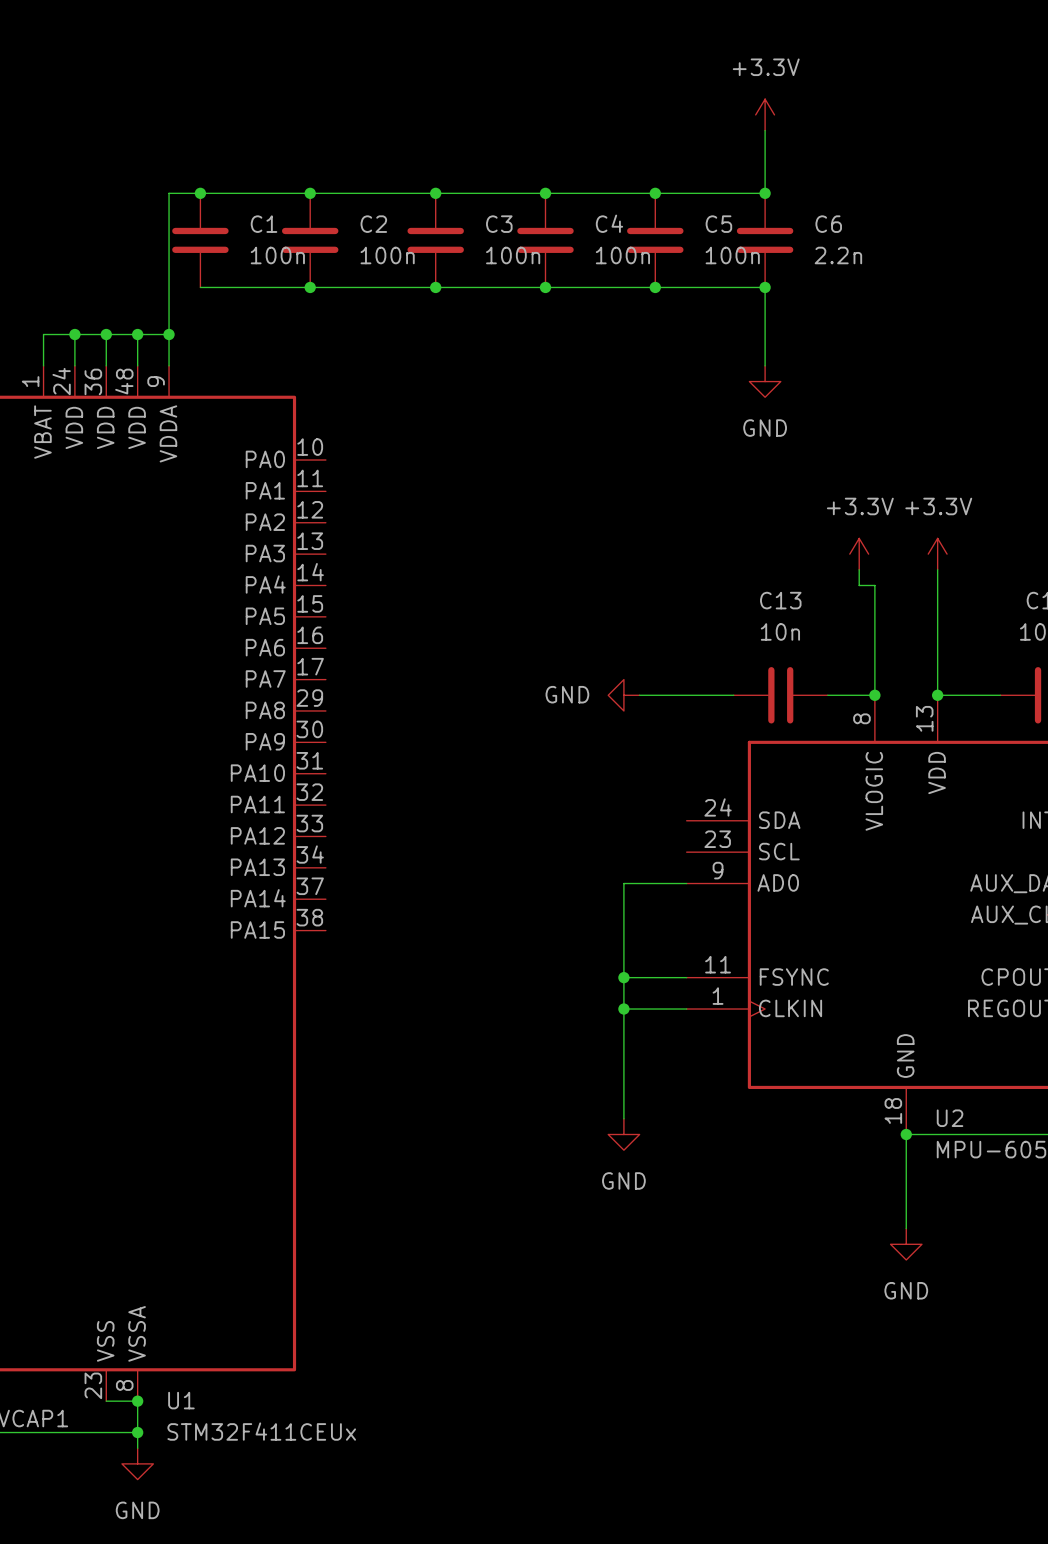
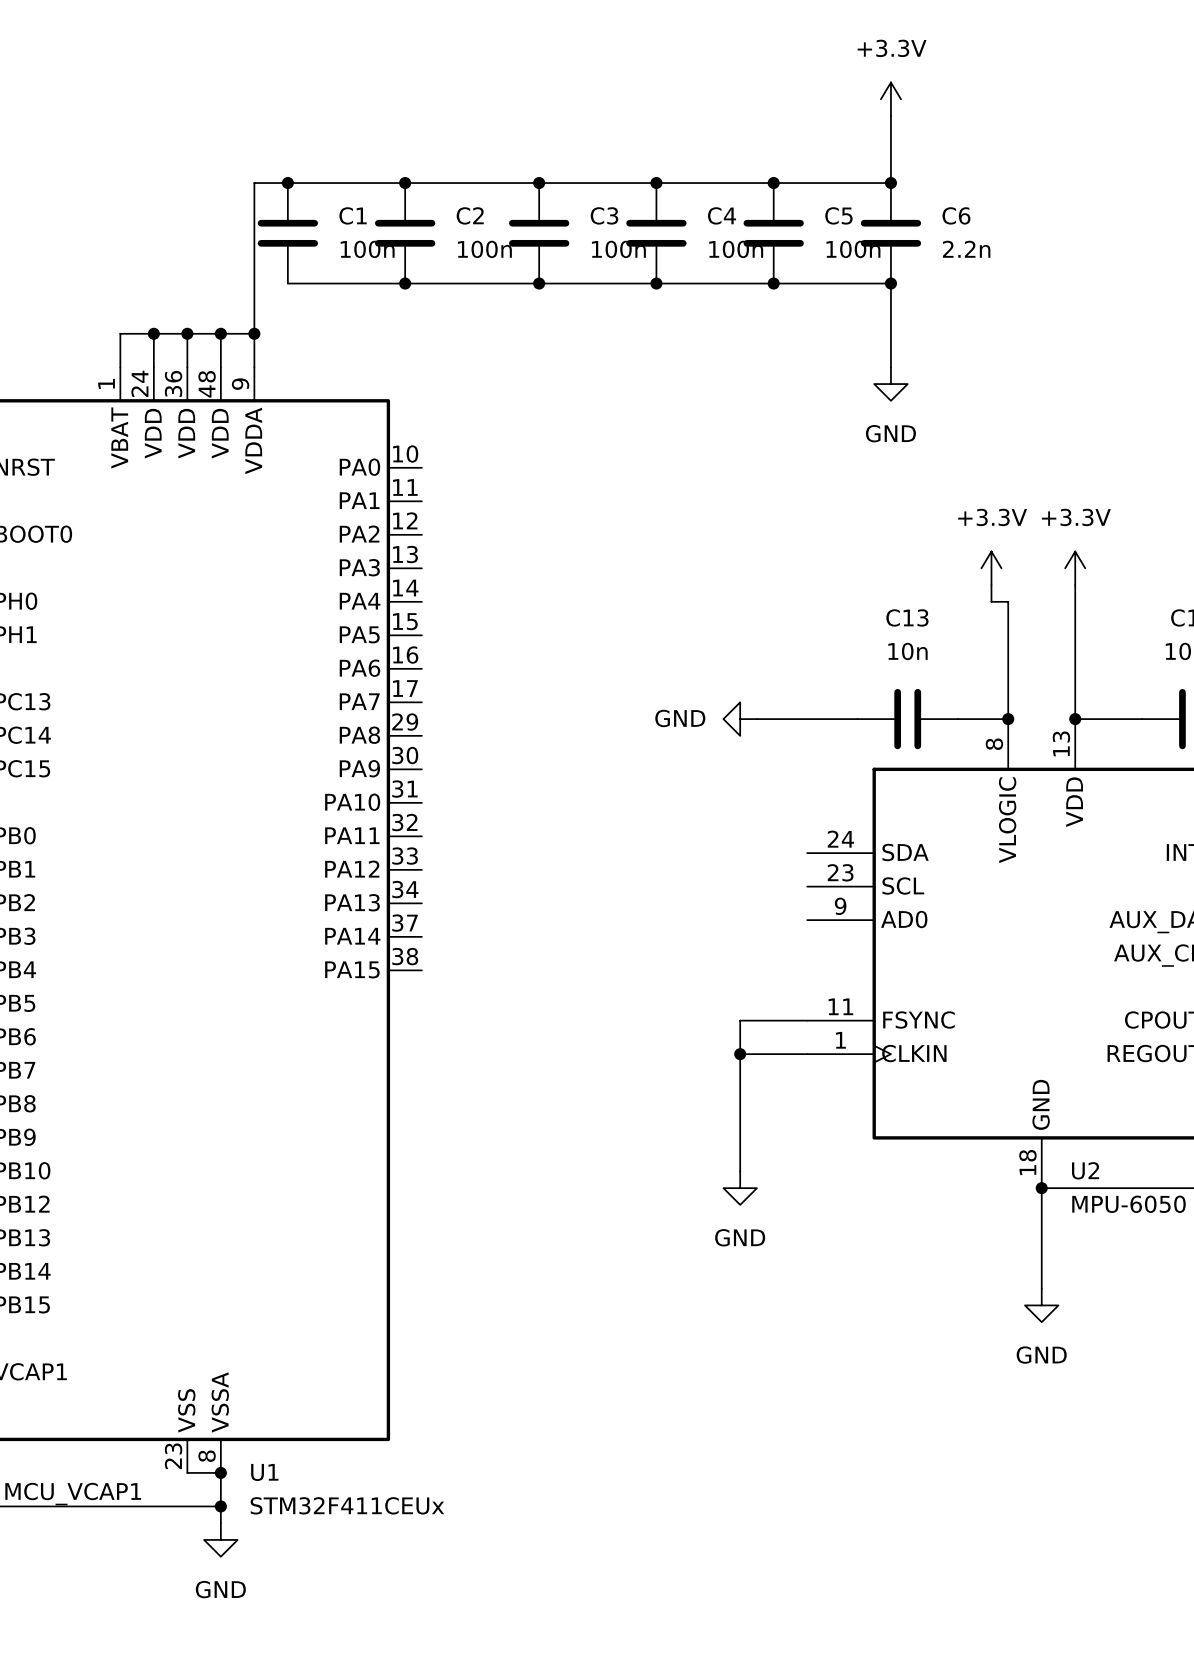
wire: (686, 883) (623, 883) (623, 977) -> none
junction: (623, 977) -> none

